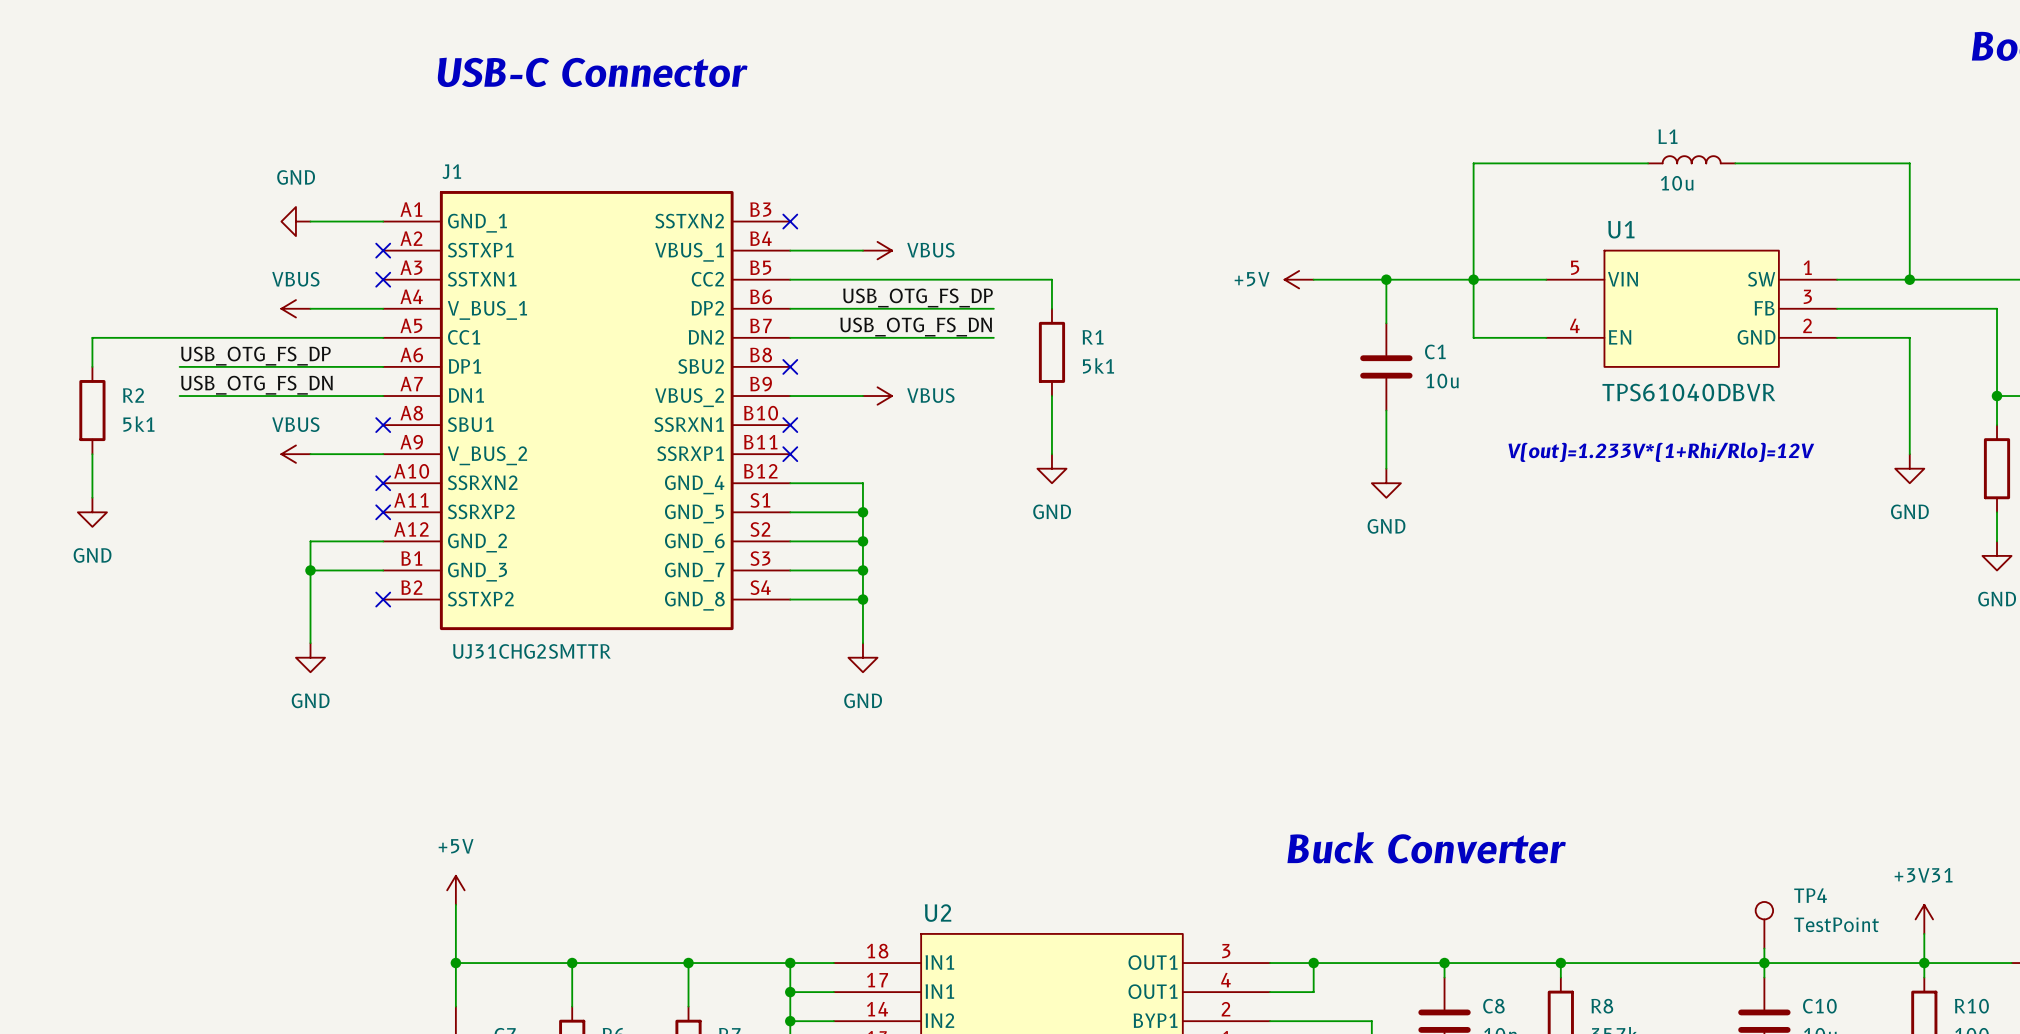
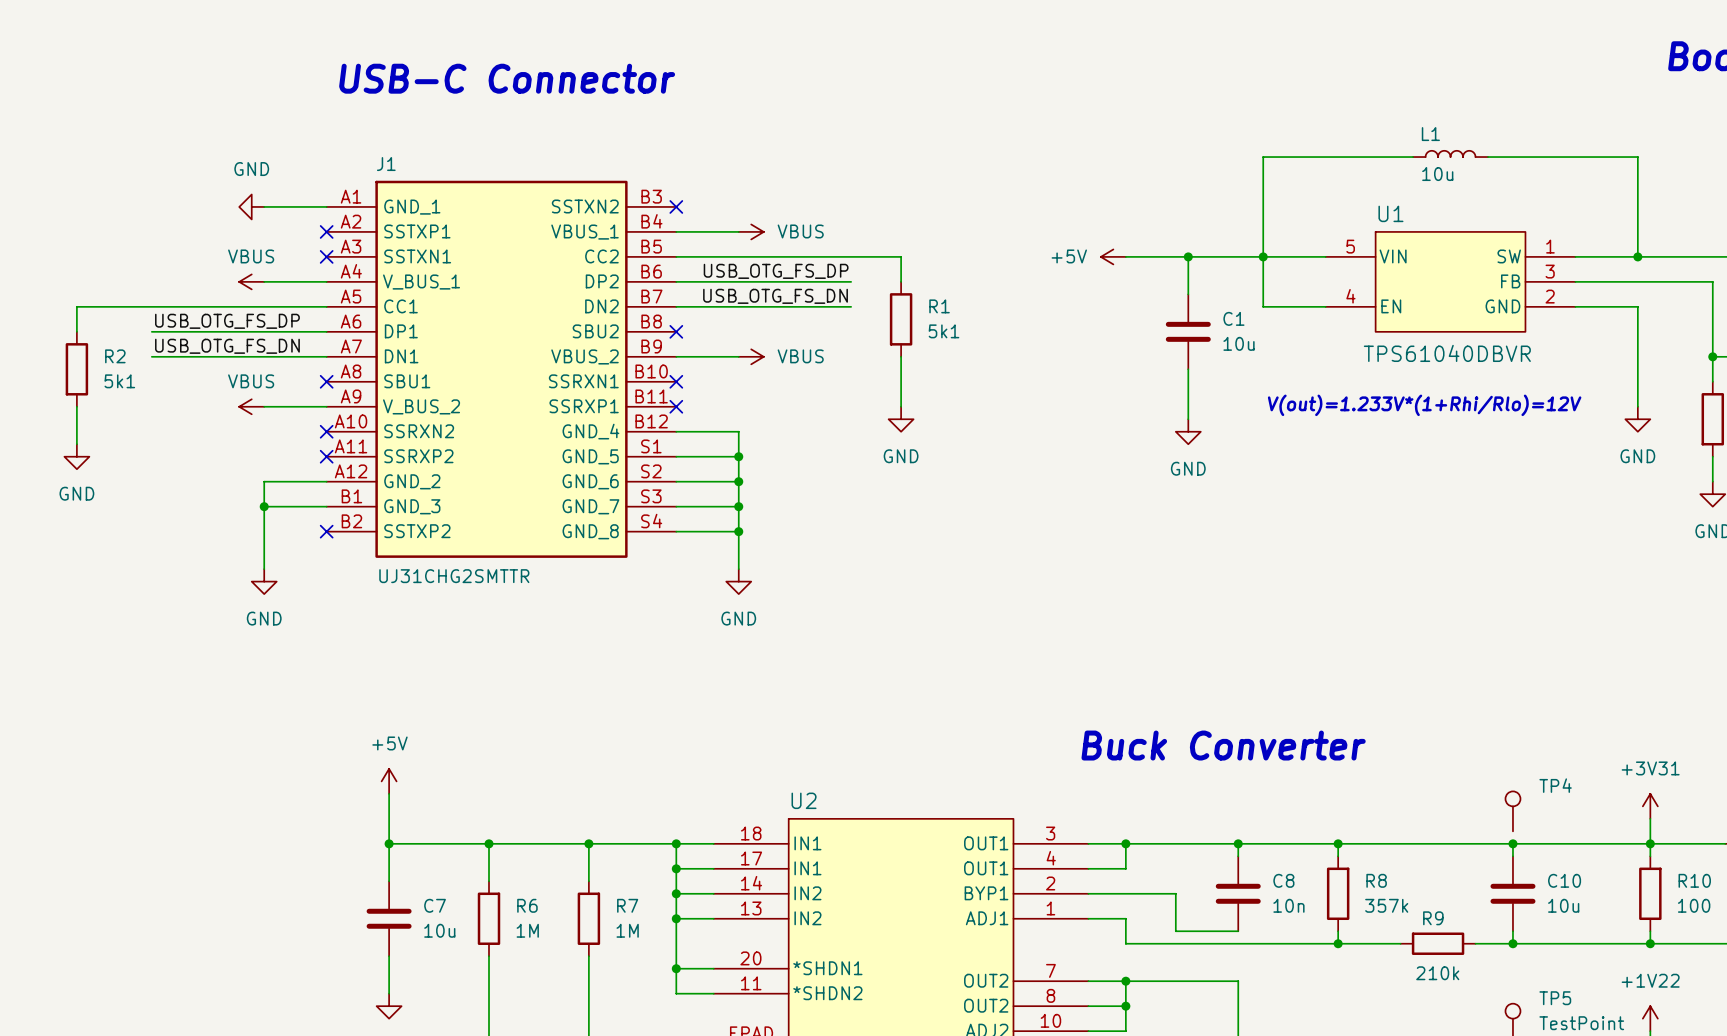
TP4 value: TestPoint (1836, 924) -> none
wire: (1764, 948) (1764, 963) -> none

